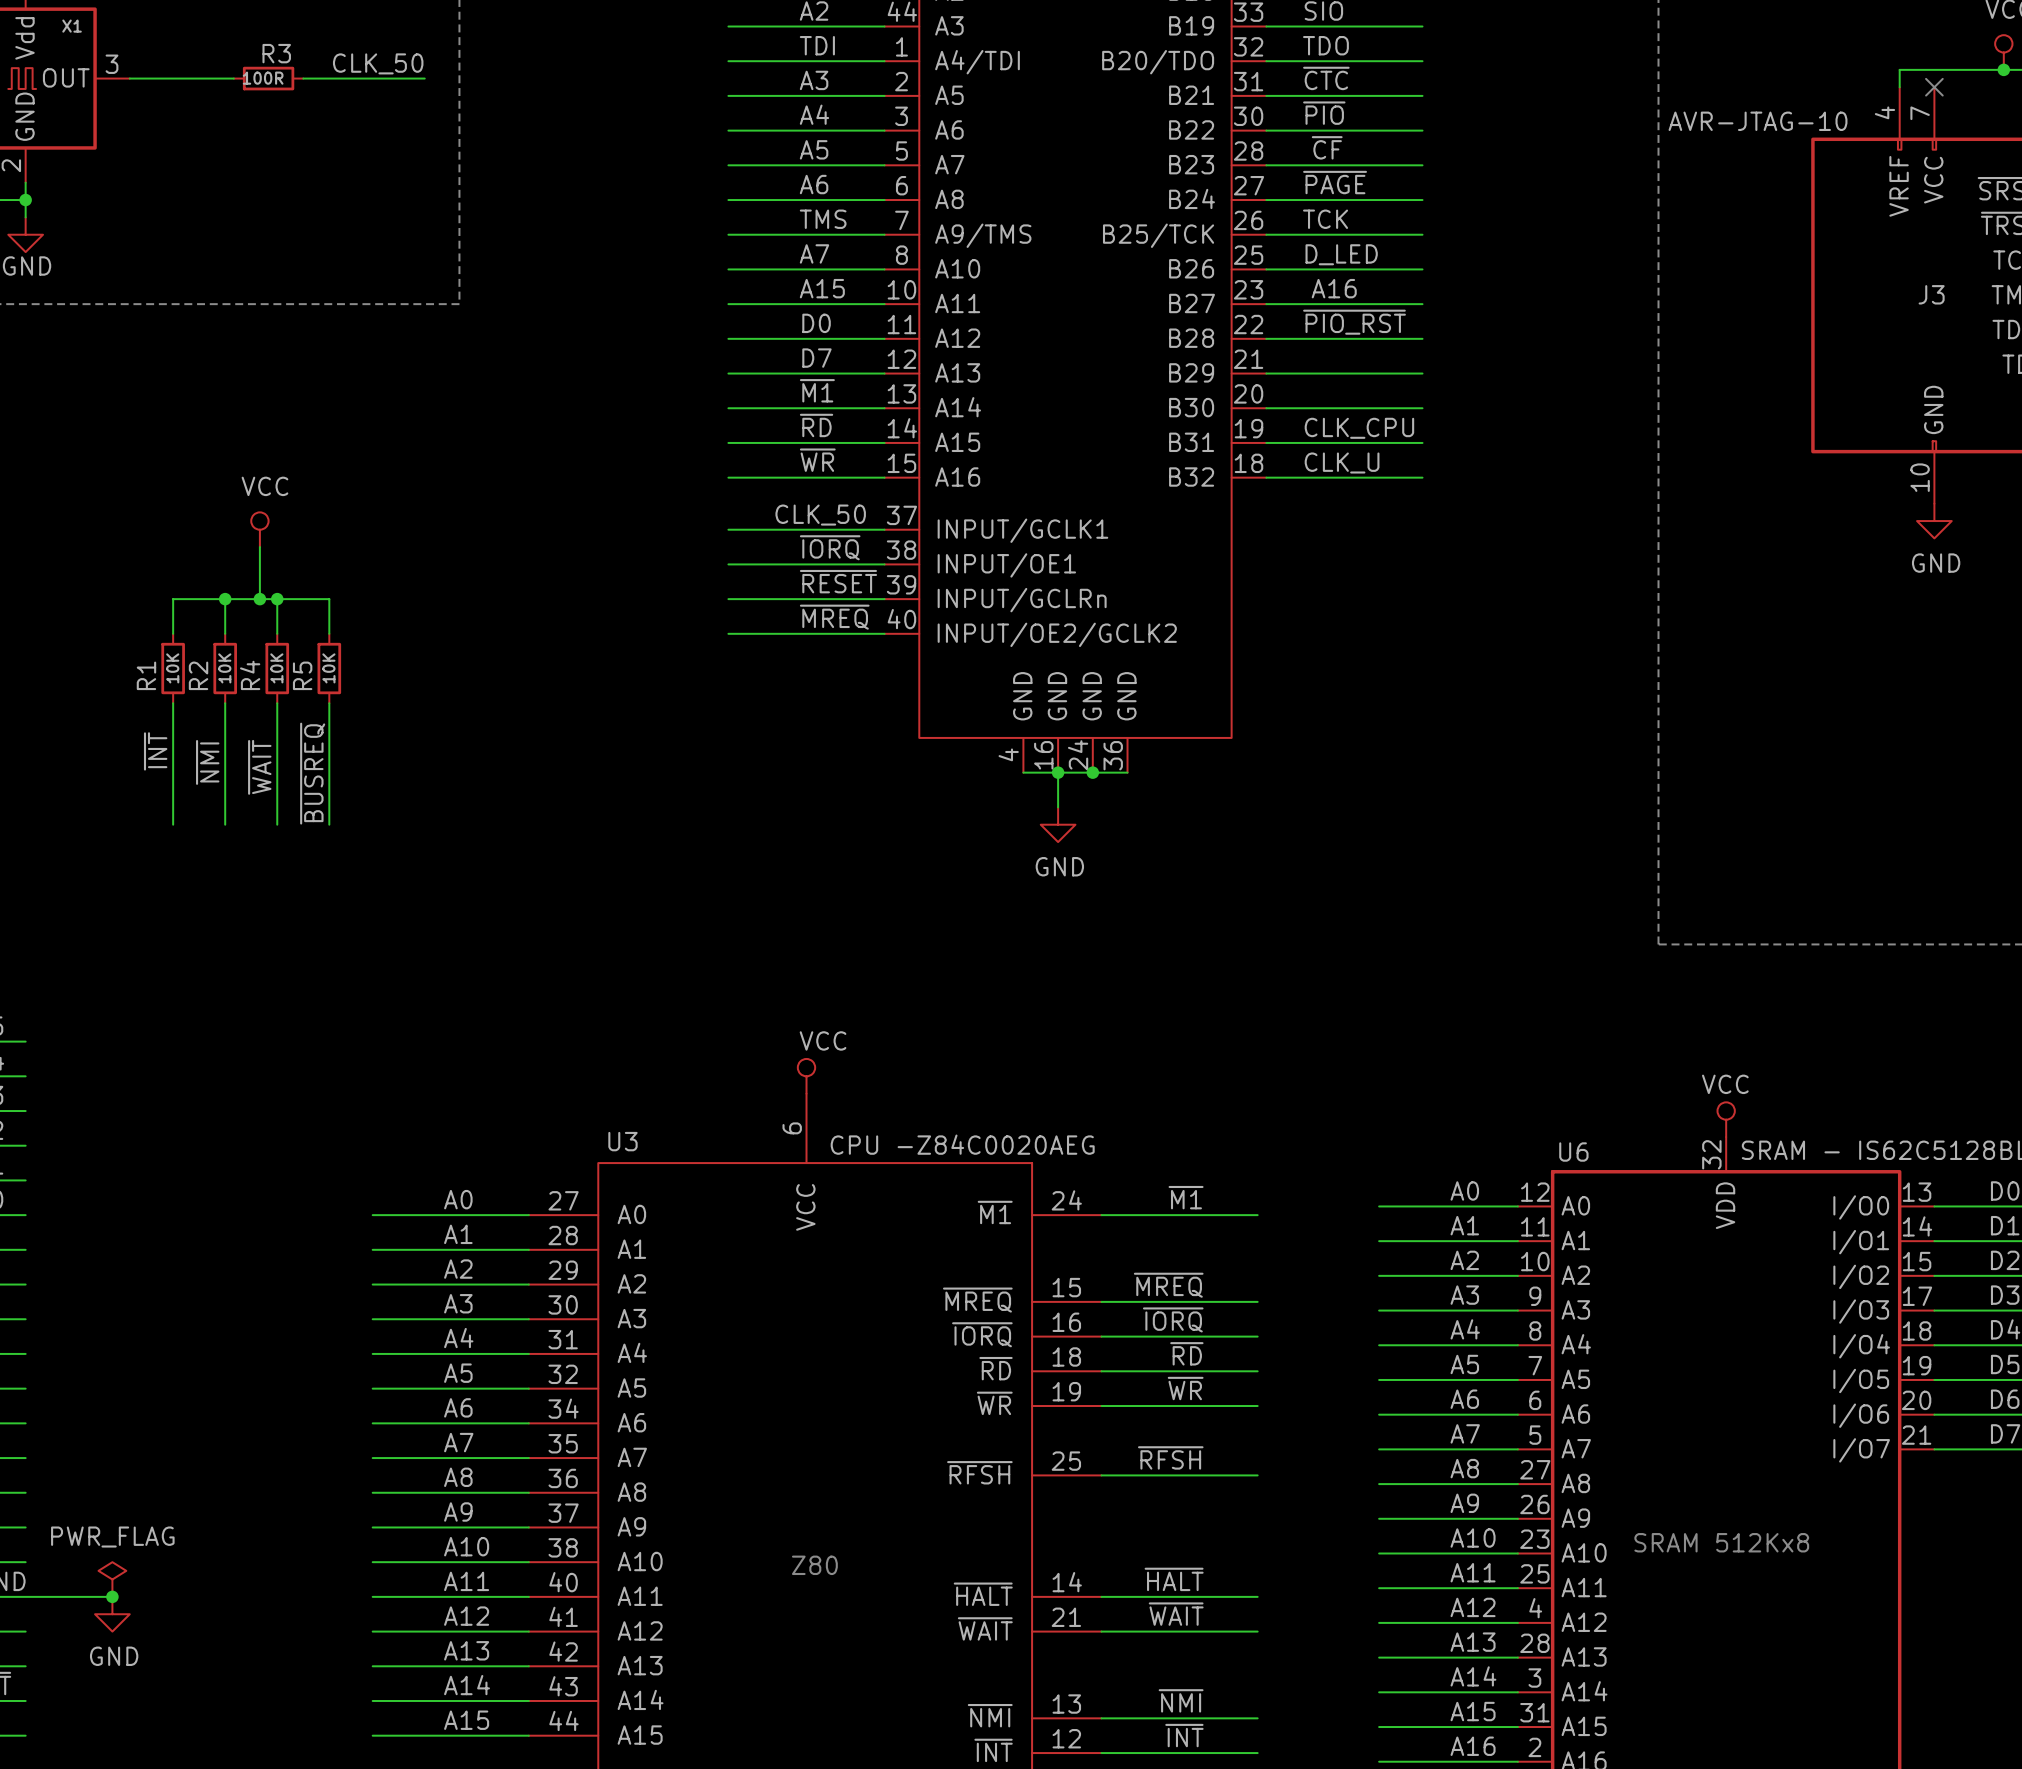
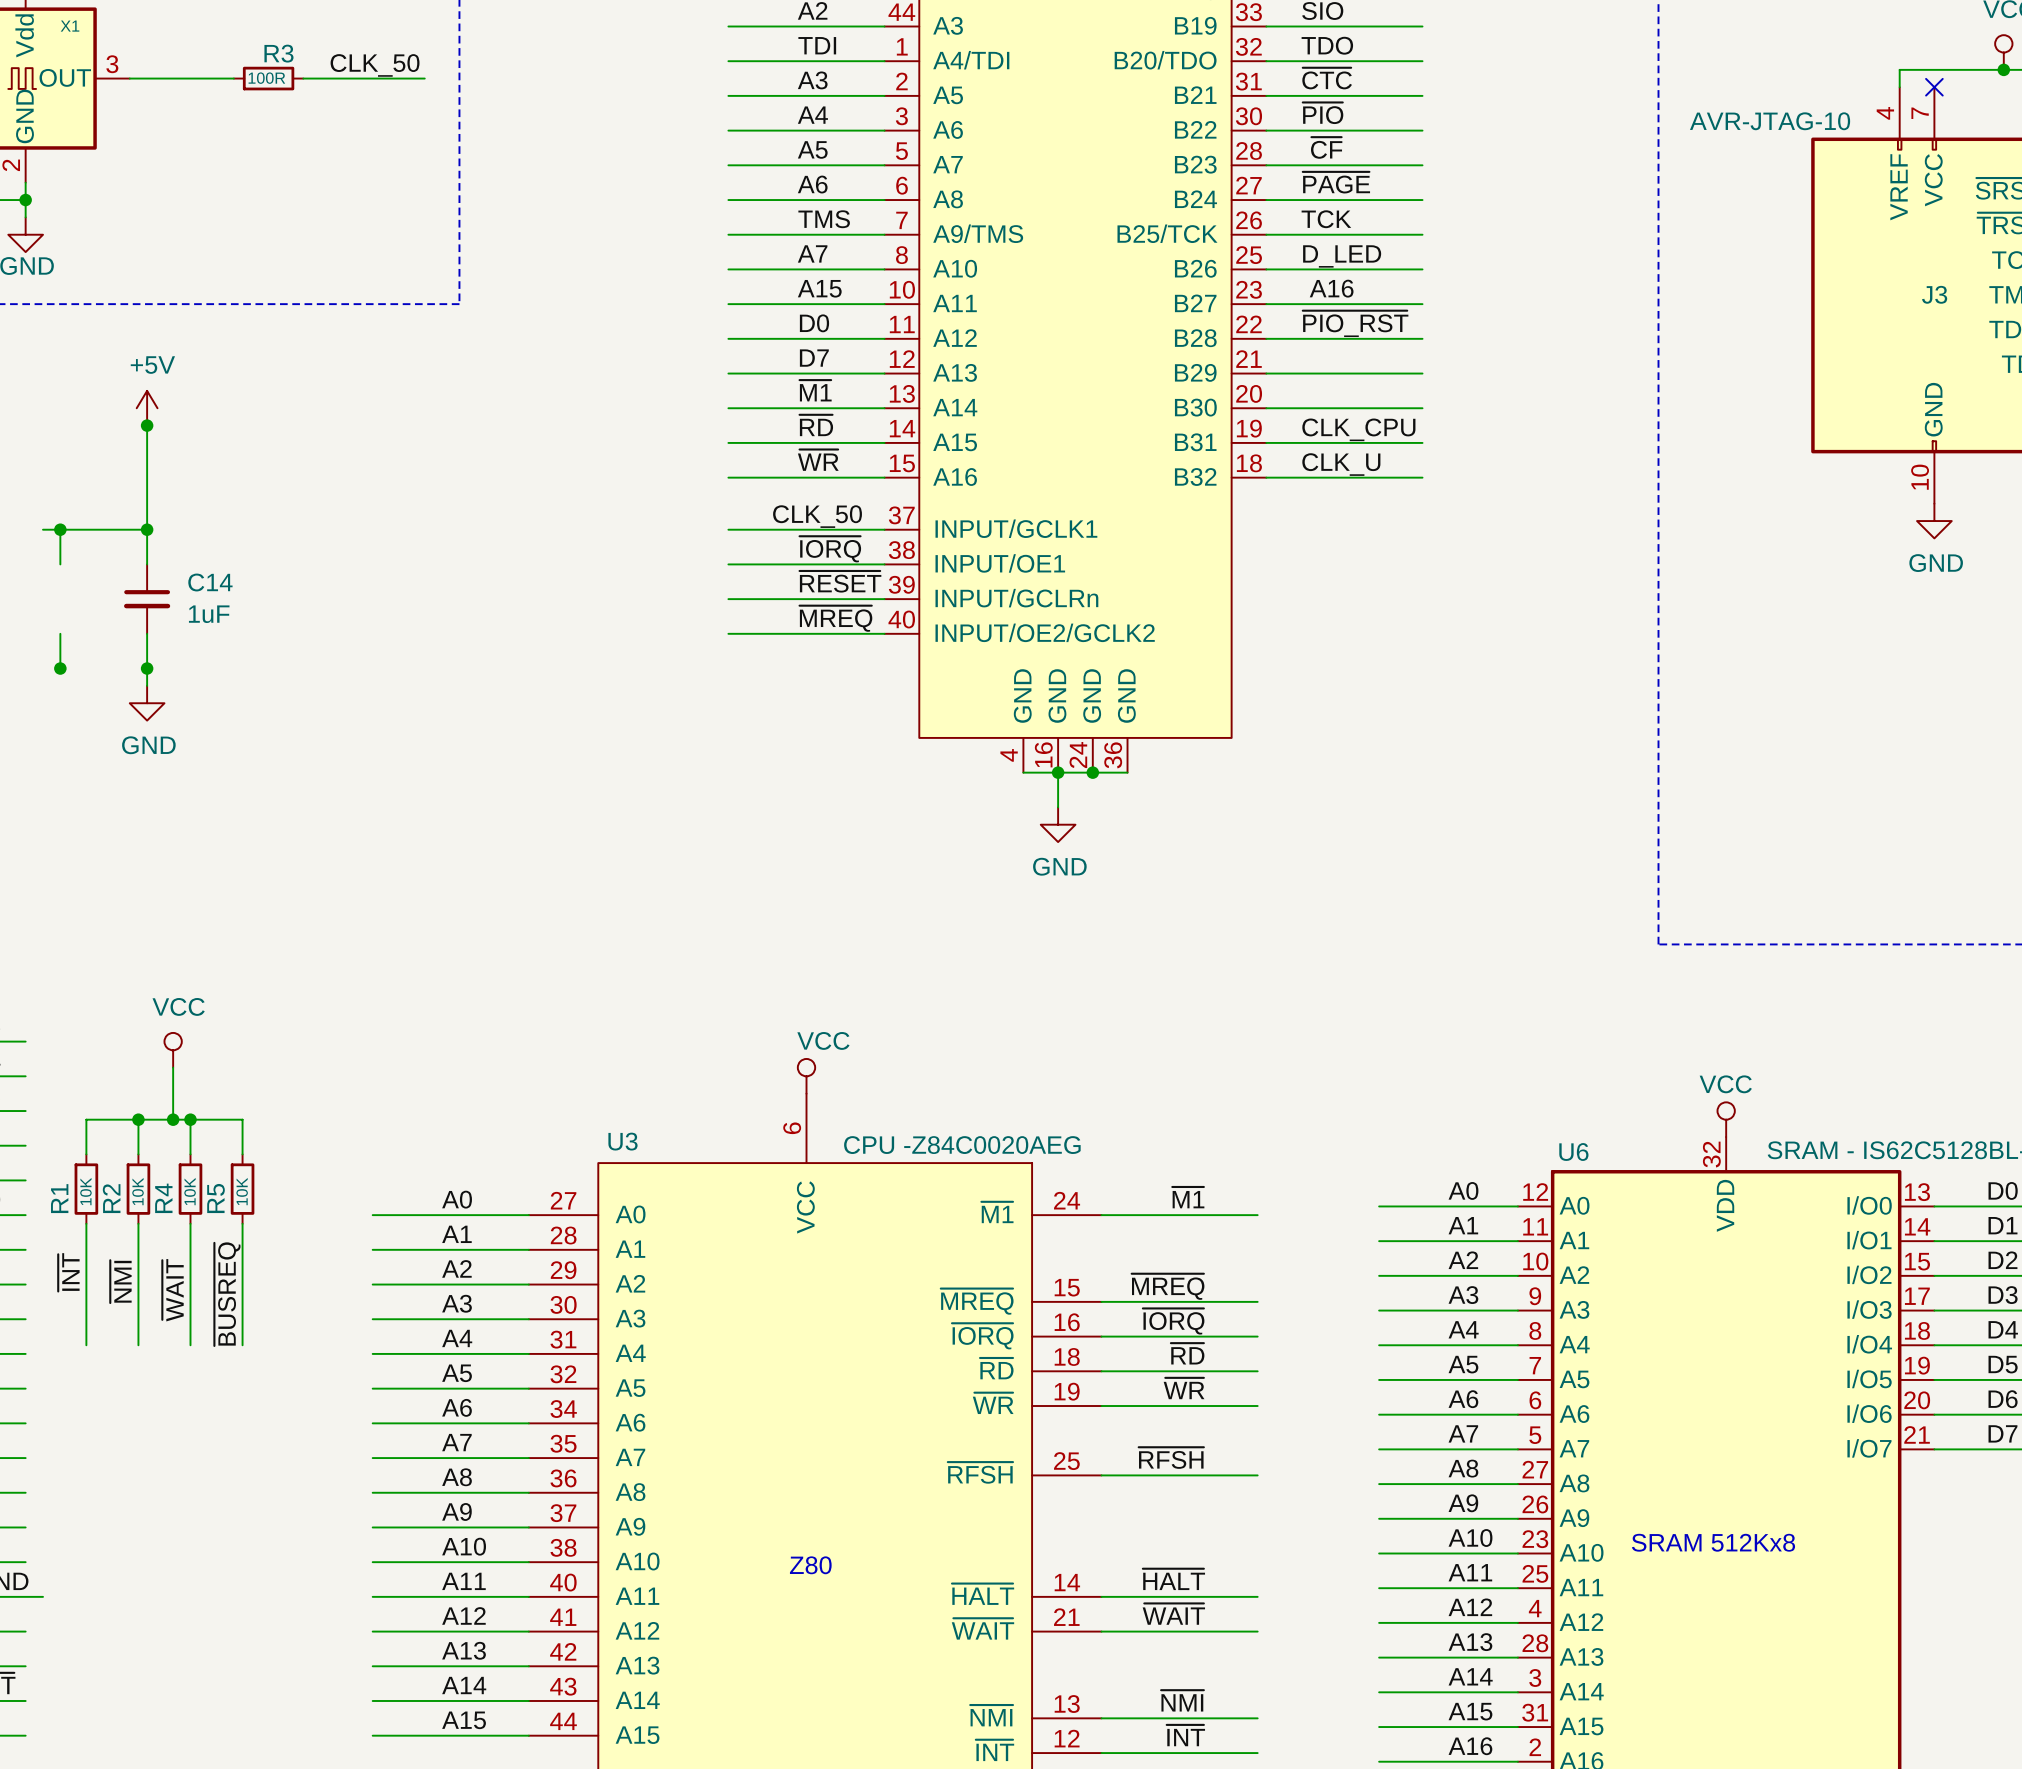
power symbol: none -> +5V (147, 408)
wire: none -> (147, 425) (147, 564)
junction: none -> (147, 425)
wire: none -> (43, 529) (147, 529)
junction: none -> (60, 529)
junction: none -> (147, 529)
power symbol: VCC (259, 529) -> none
wire: (259, 547) (259, 599) -> (147, 633) (147, 685)
C14: none -> 1uF (147, 599)
wire: (225, 599) (225, 633) -> (60, 633) (60, 668)
junction: (225, 599) -> none
junction: (259, 599) -> none
wire: (277, 599) (277, 633) -> (60, 529) (60, 564)
junction: (277, 599) -> none
wire: (173, 633) (173, 599) (329, 599) (329, 633) -> none
junction: none -> (60, 668)
junction: none -> (147, 668)
R1 position: (173, 668) -> (86, 1189)
R2 position: (225, 668) -> (138, 1189)
R4 position: (277, 668) -> (190, 1189)
R5 position: (329, 668) -> (242, 1189)
power symbol: none -> GND (147, 703)
wire: (173, 703) (173, 824) -> none
wire: (225, 703) (225, 824) -> none
wire: (277, 703) (277, 824) -> none
wire: (329, 703) (329, 824) -> none
label: ~{INT} (155, 751) -> none
label: ~{NMI} (207, 762) -> none
label: ~{WAIT} (259, 767) -> none
label: ~{BUSREQ} (312, 773) -> none
power symbol: none -> VCC (173, 1050)
wire: none -> (173, 1067) (173, 1119)
wire: none -> (138, 1119) (138, 1154)
junction: none -> (138, 1119)
junction: none -> (173, 1119)
wire: none -> (190, 1119) (190, 1154)
junction: none -> (190, 1119)
wire: none -> (86, 1154) (86, 1119) (242, 1119) (242, 1154)
wire: none -> (86, 1223) (86, 1345)
wire: none -> (138, 1223) (138, 1345)
wire: none -> (190, 1223) (190, 1345)
wire: none -> (242, 1223) (242, 1345)
label: none -> ~{INT} (68, 1272)
label: none -> ~{NMI} (120, 1281)
label: none -> ~{WAIT} (173, 1290)
label: none -> ~{BUSREQ} (227, 1294)
power symbol: PWR_FLAG (112, 1579) -> none
wire: (43, 1596) (112, 1596) -> none
junction: (112, 1596) -> none
power symbol: GND (112, 1614) -> none

